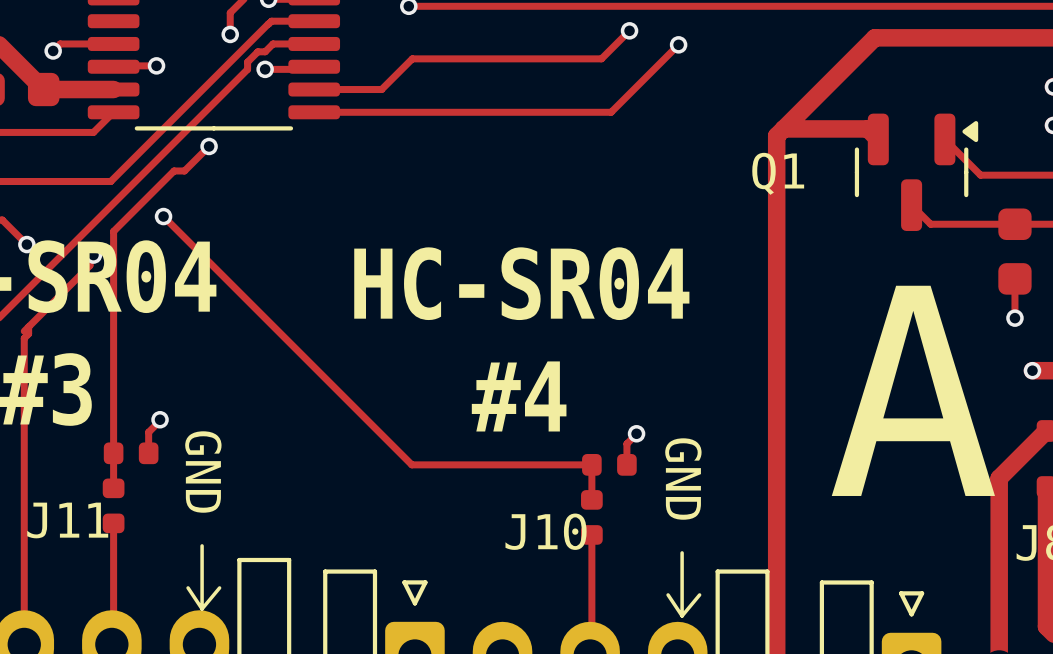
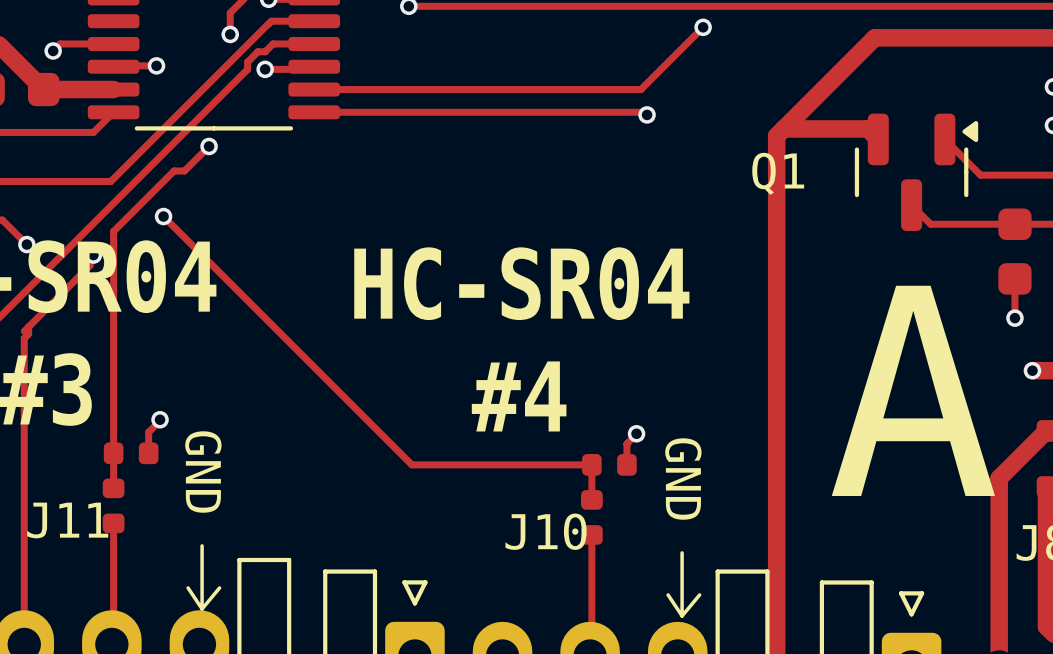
track: (629, 30) (601, 58) (412, 58) (381, 89) -> (703, 27) (640, 89) (381, 89)
via: (629, 30) -> none
track: (678, 44) (611, 112) -> (647, 114) (644, 112) (611, 112)
via position: (678, 44) -> (703, 27)
via: none -> (647, 114)

